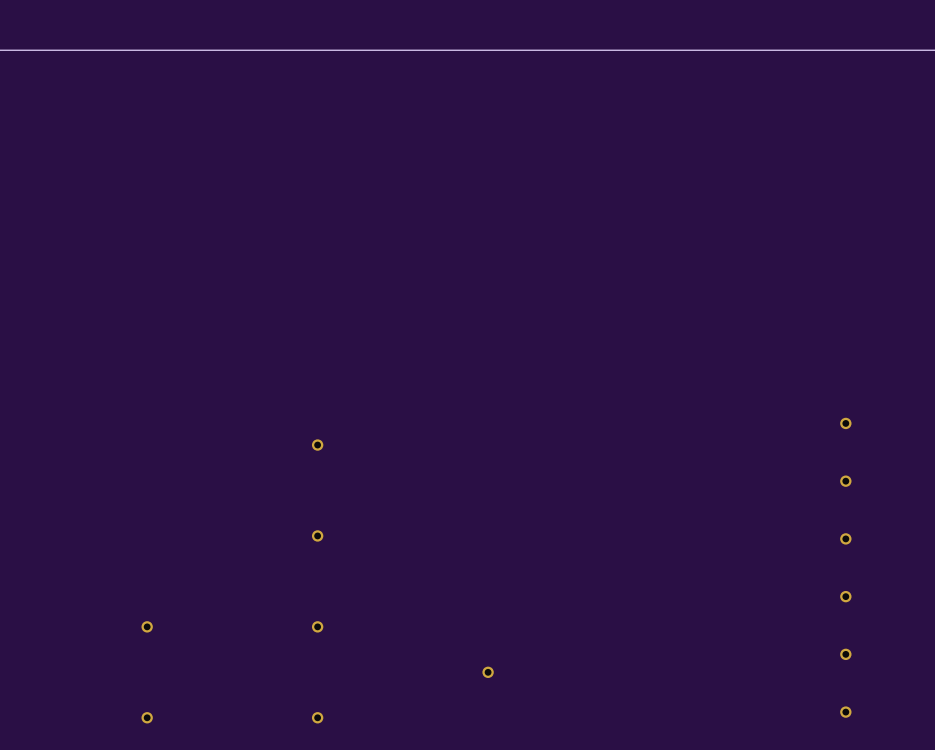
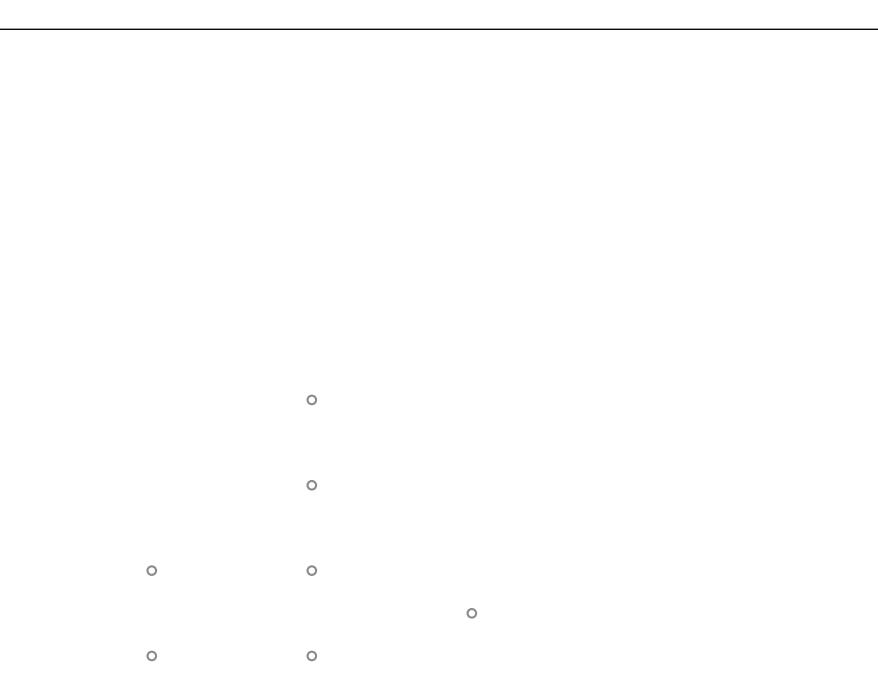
via: (845, 423) -> none
via: (845, 481) -> none
via: (845, 538) -> none
via: (845, 596) -> none
via: (845, 654) -> none
via: (845, 712) -> none

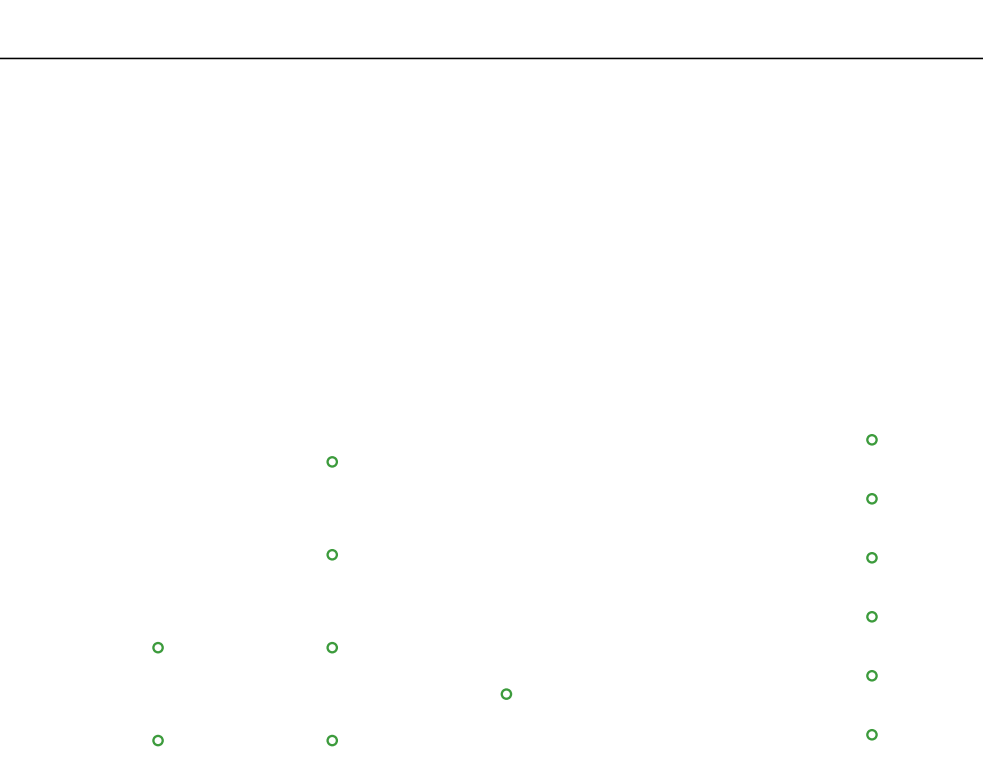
via: none -> (871, 439)
via: none -> (871, 498)
via: none -> (871, 557)
via: none -> (871, 616)
via: none -> (871, 675)
via: none -> (871, 734)

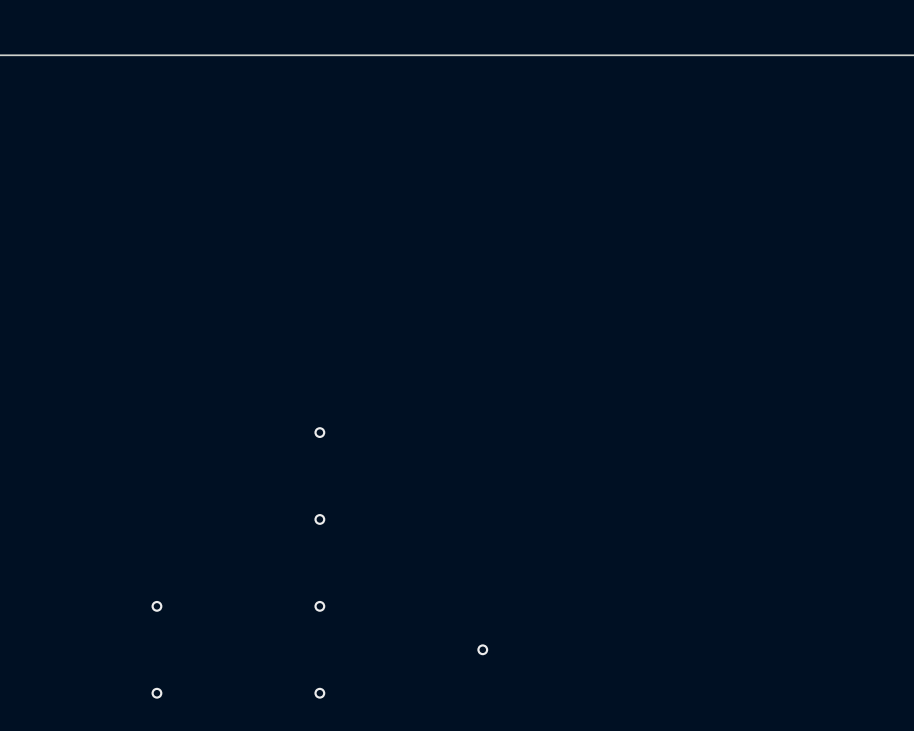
via: (871, 439) -> none
via: (871, 498) -> none
via: (871, 557) -> none
via: (871, 616) -> none
via: (871, 675) -> none
via: (871, 734) -> none

